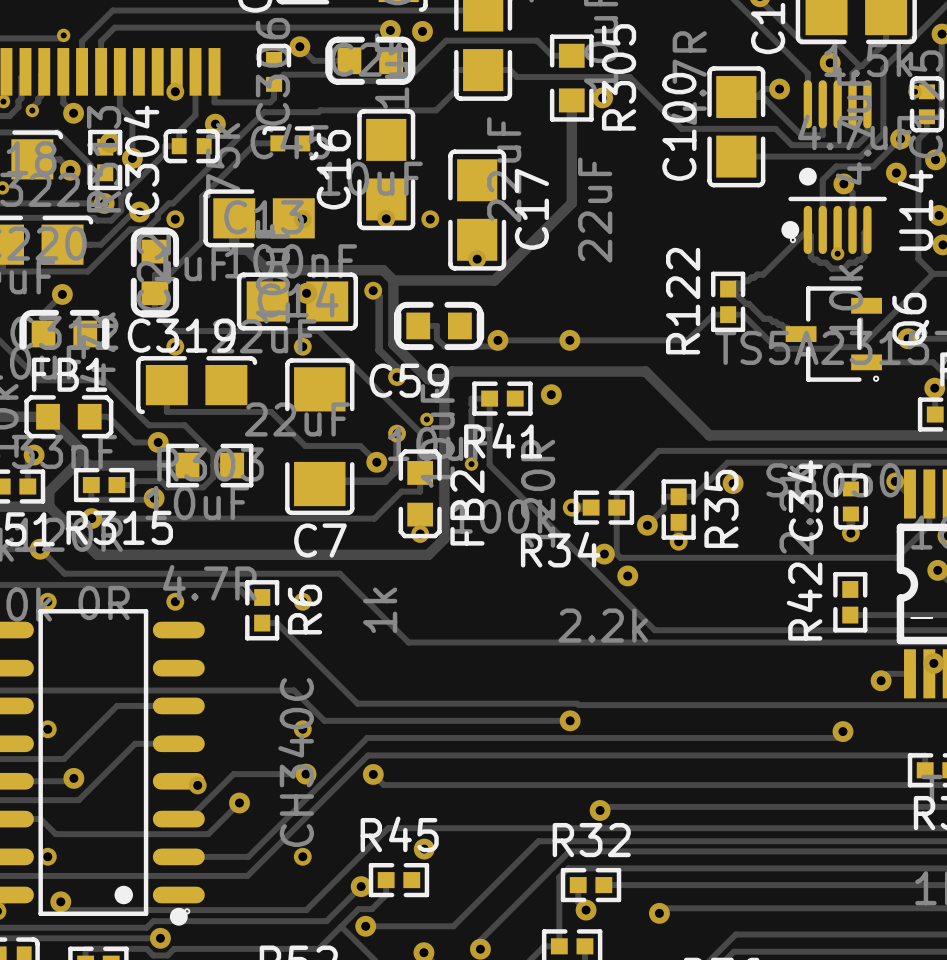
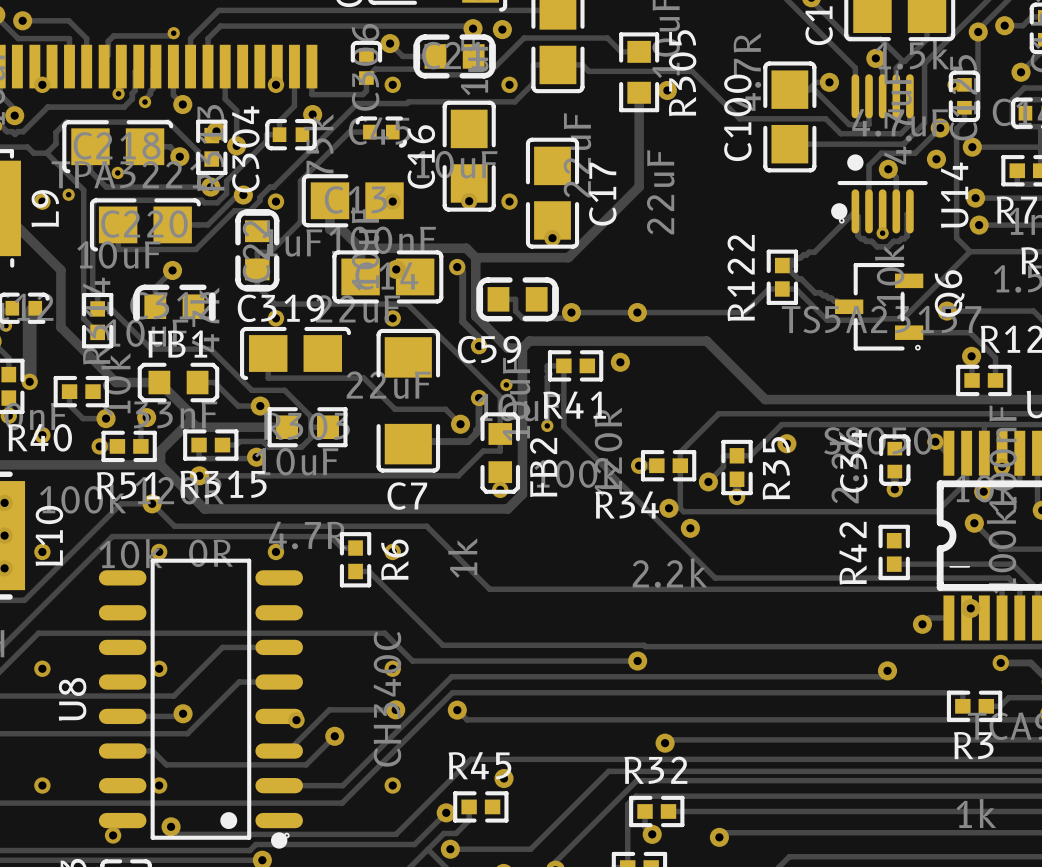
via: none -> (392, 84)
via: none -> (509, 84)

